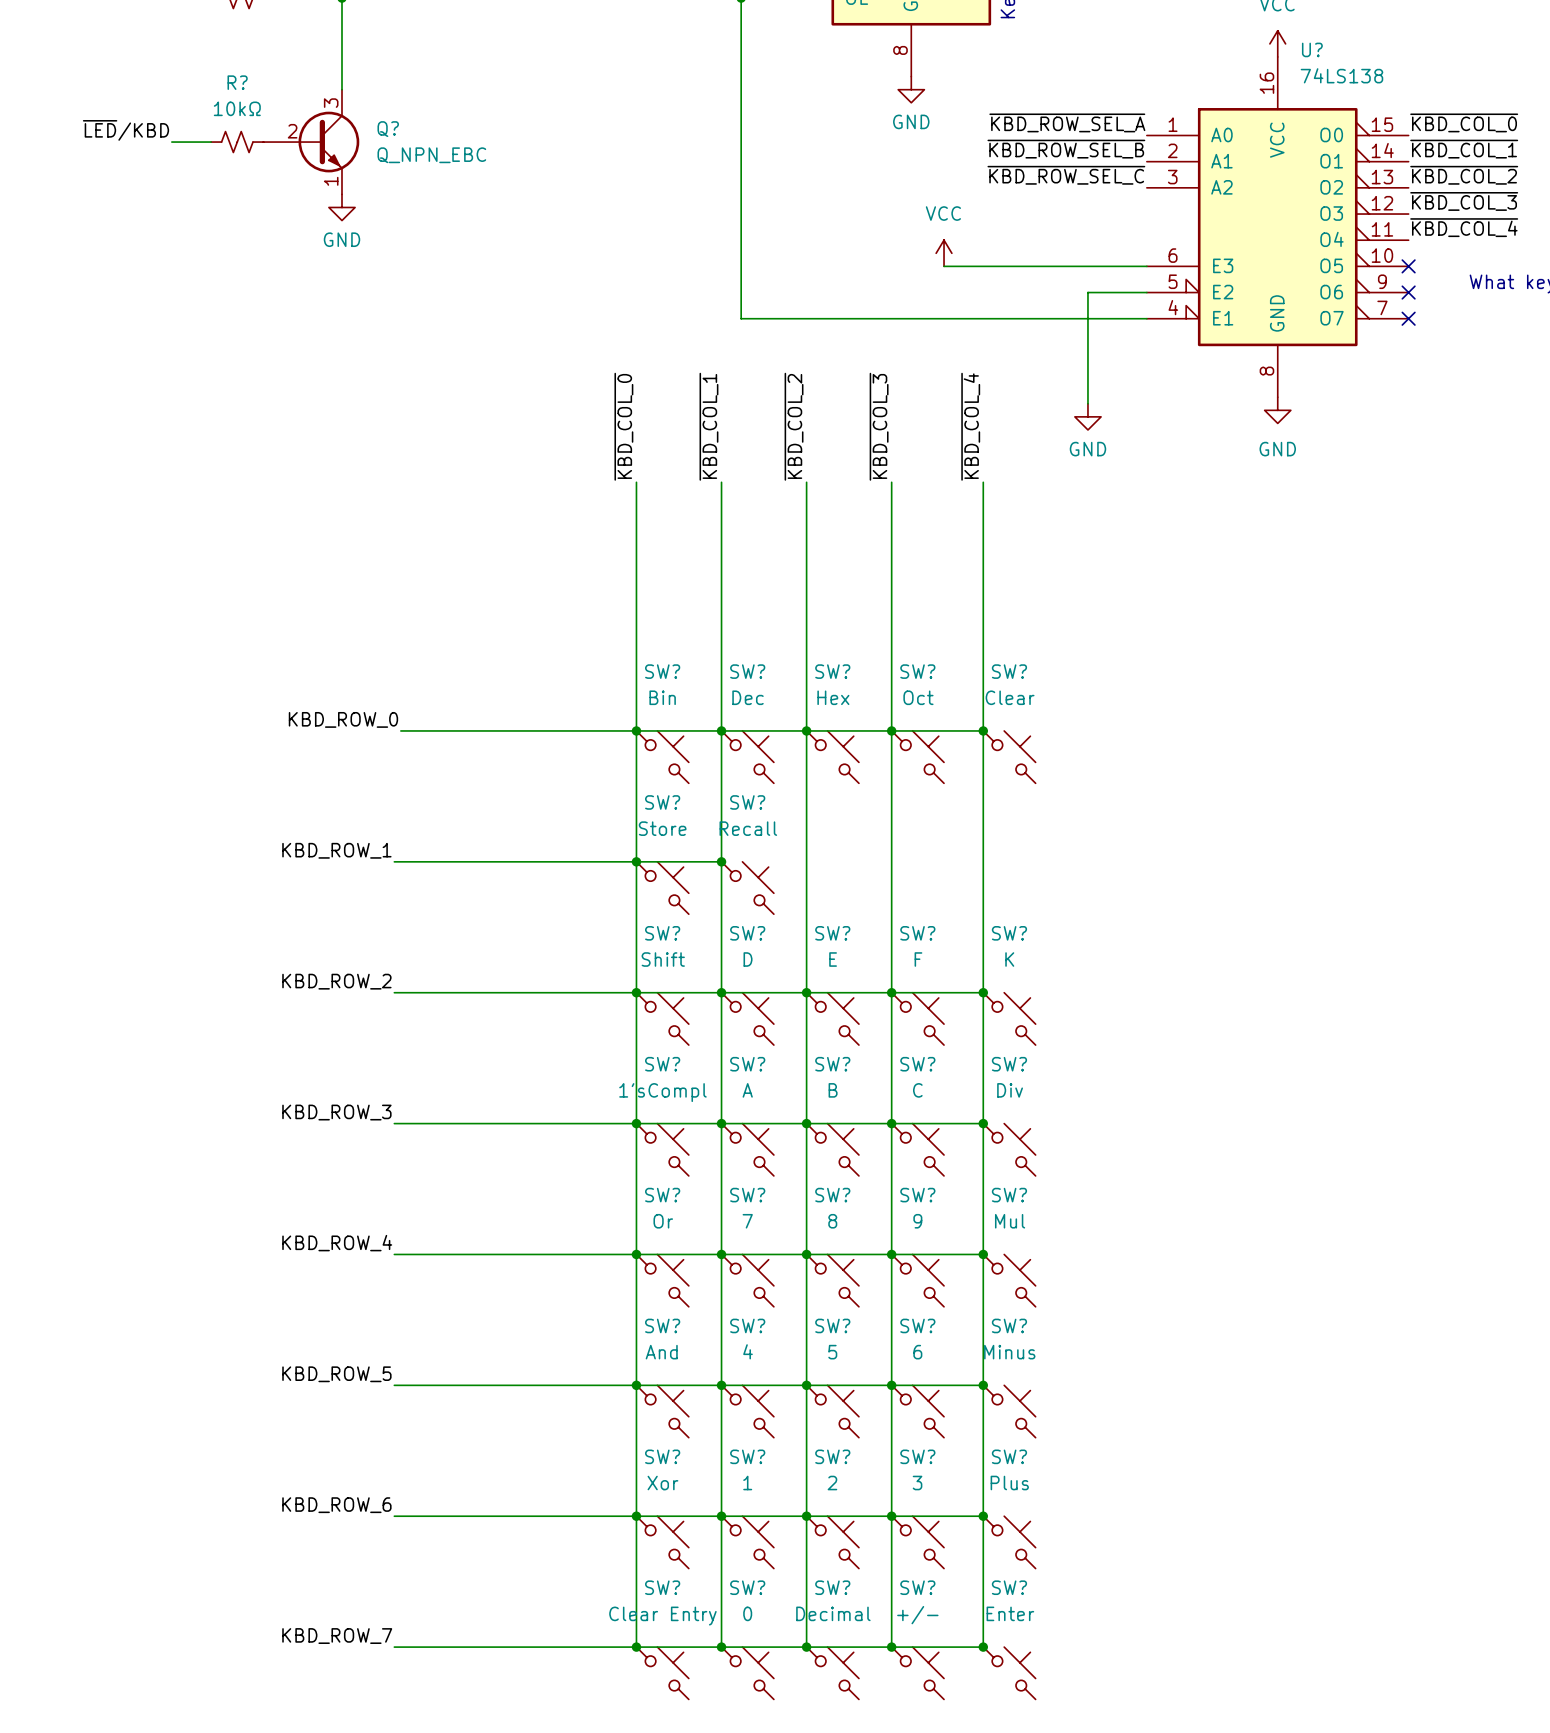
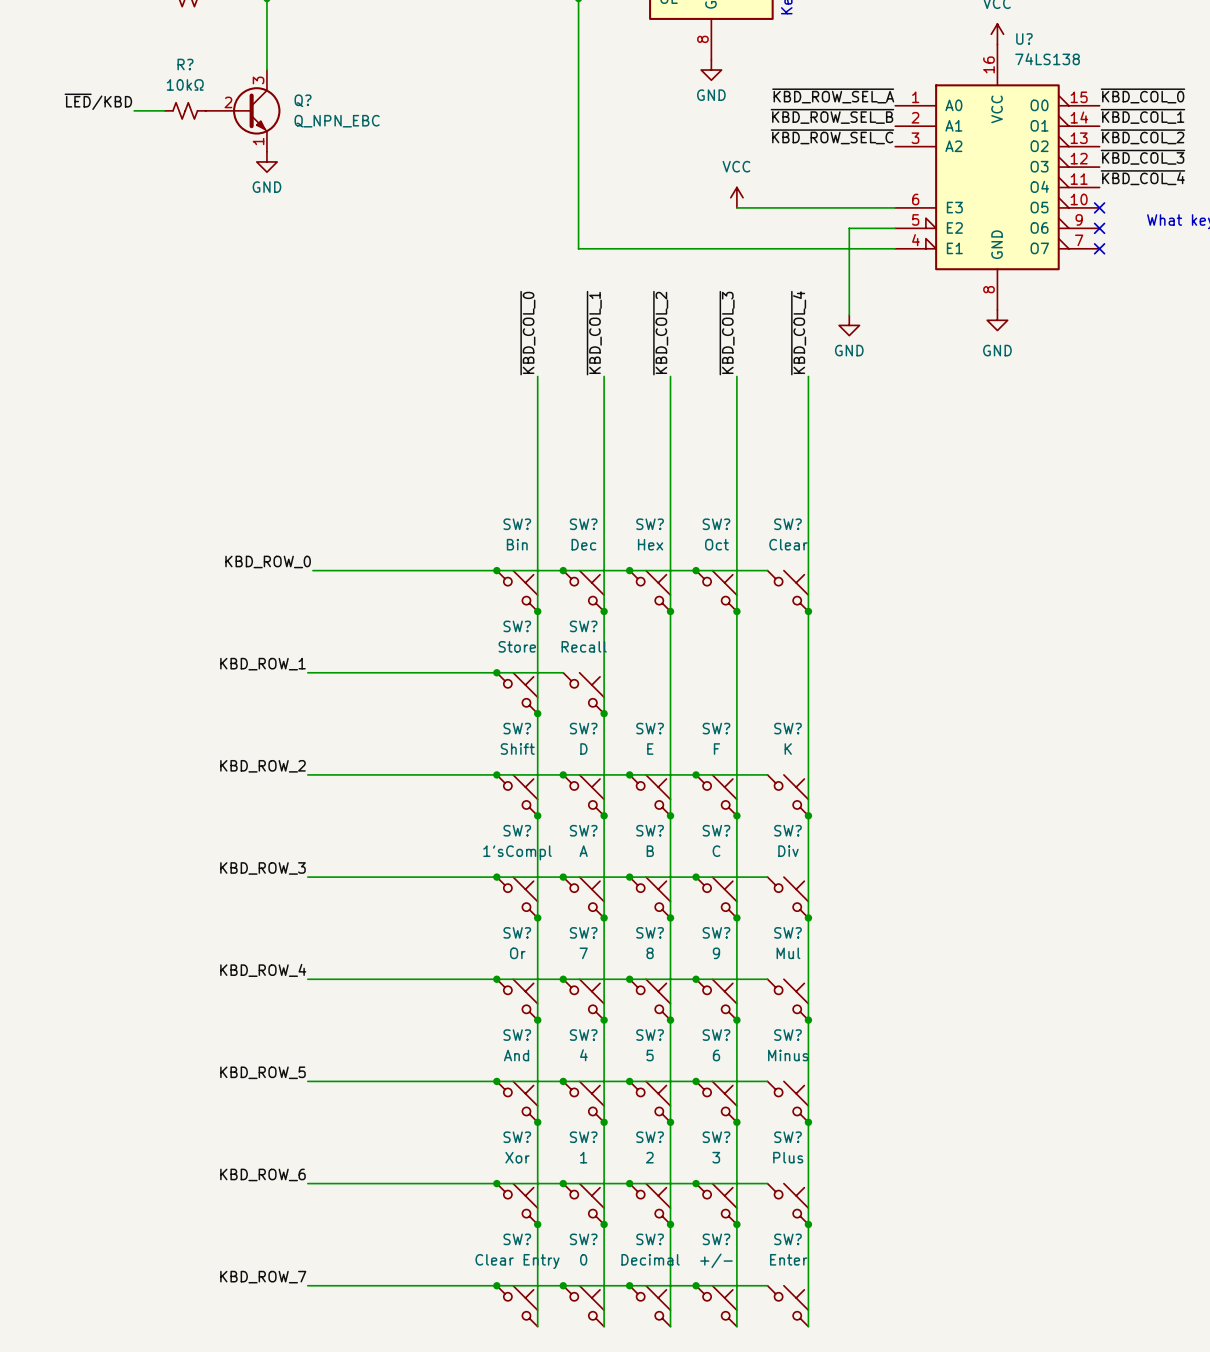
label position: ~{KBD_COL_0} (623, 426) -> ~{KBD_COL_0} (527, 333)
label position: ~{KBD_COL_1} (708, 426) -> ~{KBD_COL_1} (594, 333)
label position: ~{KBD_COL_2} (794, 426) -> ~{KBD_COL_2} (660, 333)
label position: ~{KBD_COL_3} (879, 426) -> ~{KBD_COL_3} (727, 333)
label position: ~{KBD_COL_4} (970, 426) -> ~{KBD_COL_4} (798, 333)
wire: (636, 482) (636, 1647) -> none
wire: none -> (537, 376) (537, 1326)
wire: (721, 482) (721, 1647) -> none
wire: none -> (604, 376) (604, 1326)
wire: (806, 482) (806, 1647) -> none
wire: none -> (670, 376) (670, 1326)
wire: (891, 482) (891, 1647) -> none
wire: none -> (736, 376) (736, 1326)
wire: (983, 482) (983, 1647) -> none
wire: none -> (808, 376) (808, 1326)
junction: (983, 730) -> none
junction: none -> (537, 611)
junction: none -> (604, 611)
junction: none -> (670, 611)
junction: none -> (736, 611)
junction: none -> (808, 611)
junction: (721, 861) -> none
junction: none -> (537, 713)
junction: none -> (604, 713)
junction: (983, 992) -> none
junction: none -> (537, 815)
junction: none -> (604, 815)
junction: none -> (670, 815)
junction: none -> (736, 815)
junction: none -> (808, 815)
junction: (983, 1123) -> none
junction: none -> (537, 917)
junction: none -> (604, 917)
junction: none -> (670, 917)
junction: none -> (736, 917)
junction: none -> (808, 917)
junction: (983, 1254) -> none
junction: none -> (537, 1020)
junction: none -> (604, 1020)
junction: none -> (670, 1020)
junction: none -> (736, 1020)
junction: none -> (808, 1020)
junction: (983, 1385) -> none
junction: none -> (537, 1122)
junction: none -> (604, 1122)
junction: none -> (670, 1122)
junction: none -> (736, 1122)
junction: none -> (808, 1122)
junction: (983, 1516) -> none
junction: none -> (537, 1224)
junction: none -> (604, 1224)
junction: none -> (670, 1224)
junction: none -> (736, 1224)
junction: none -> (808, 1224)
junction: (983, 1647) -> none

